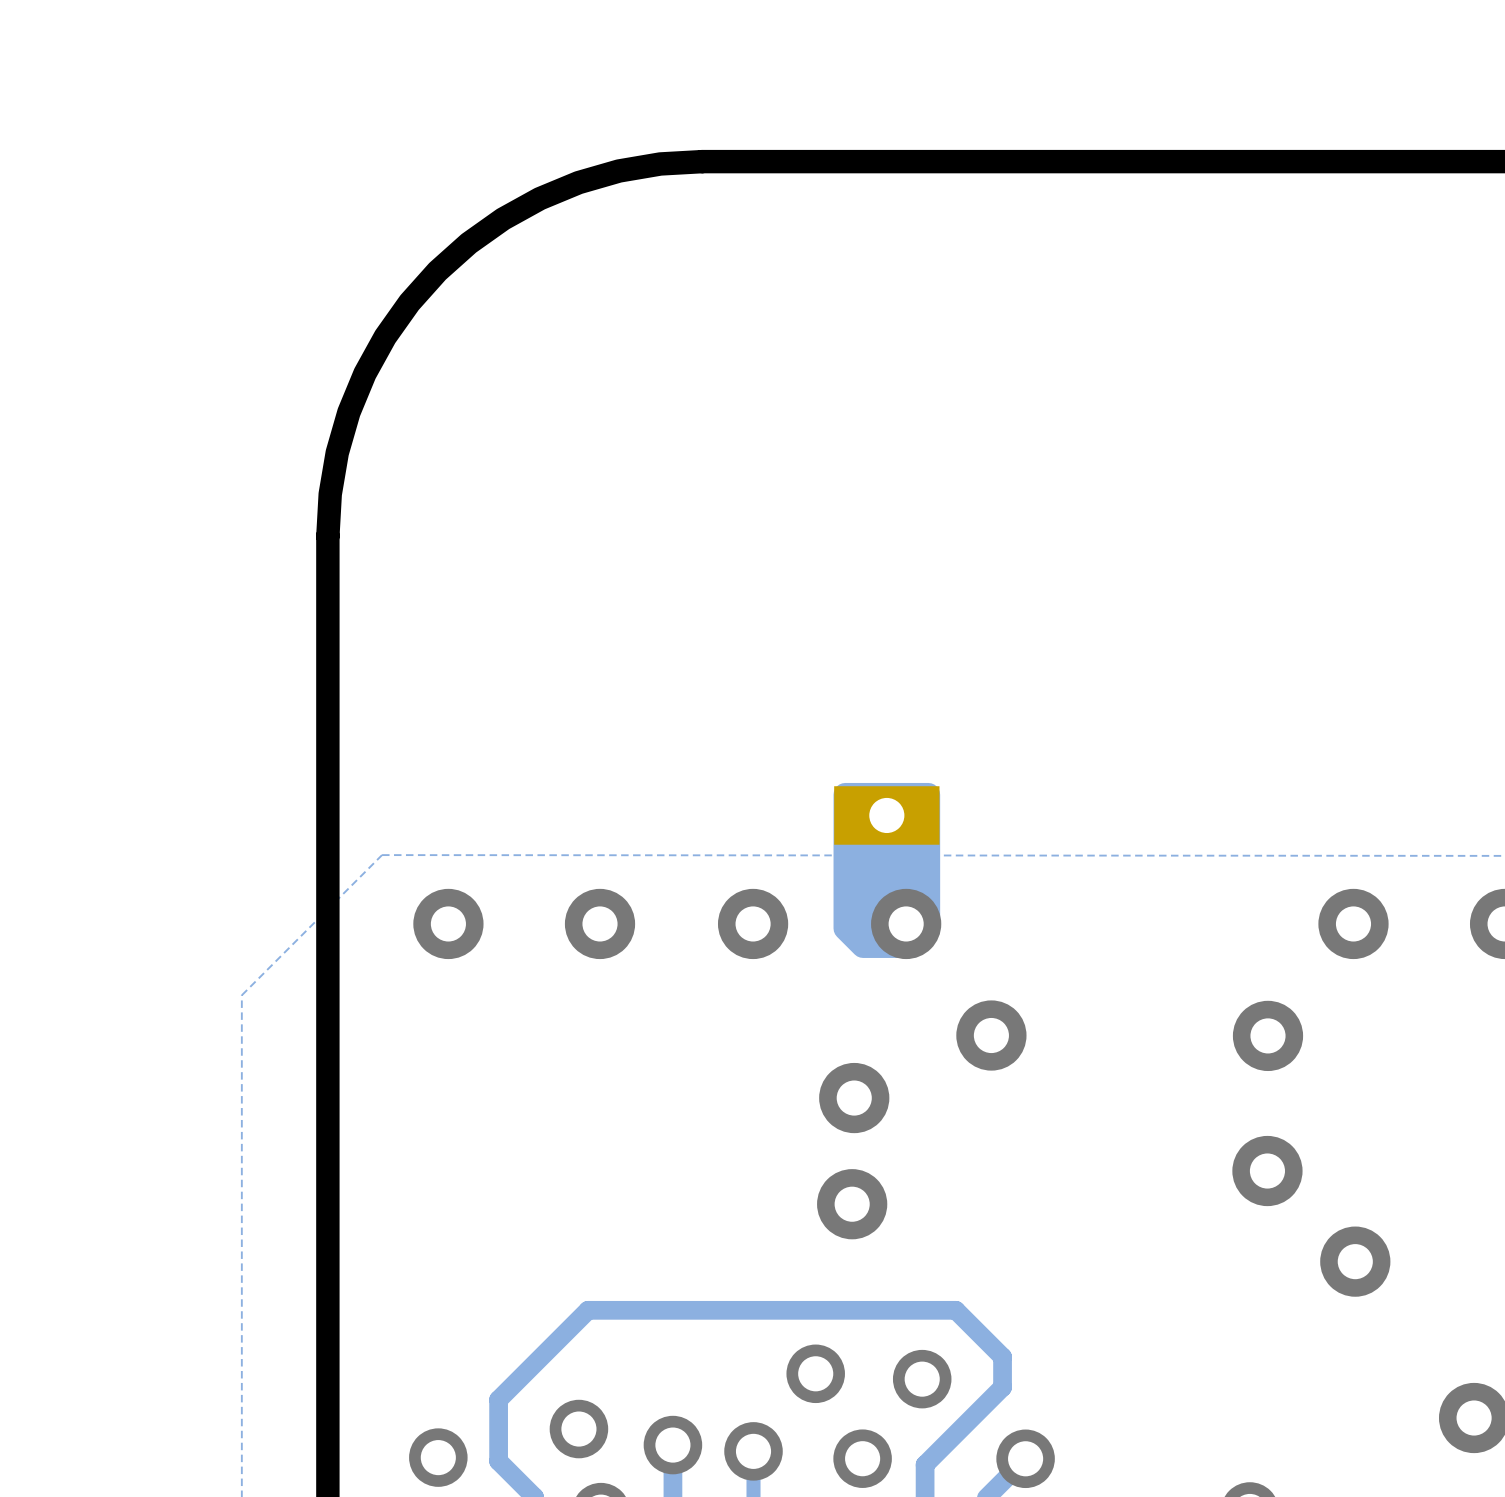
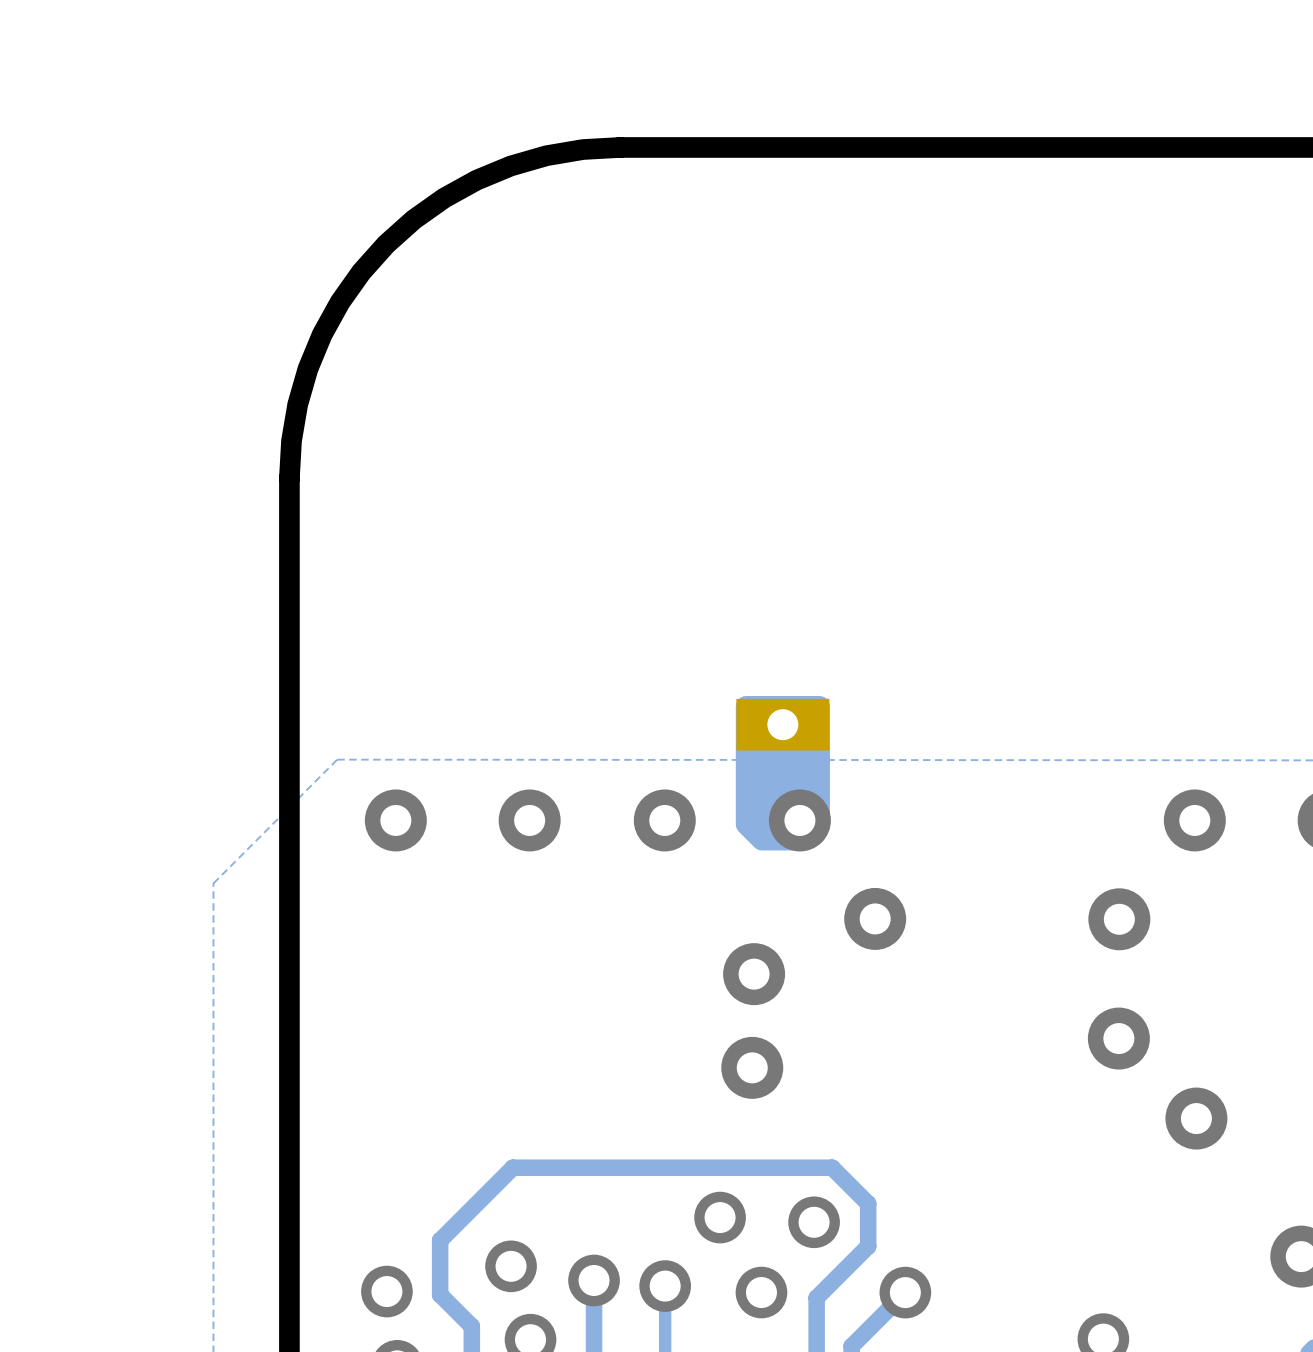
track: (581, 1317) (588, 1310) (955, 1310) (1002, 1356) (1002, 1387) (983, 1406) -> (512, 1167) (832, 1167) (868, 1203) (868, 1246)

